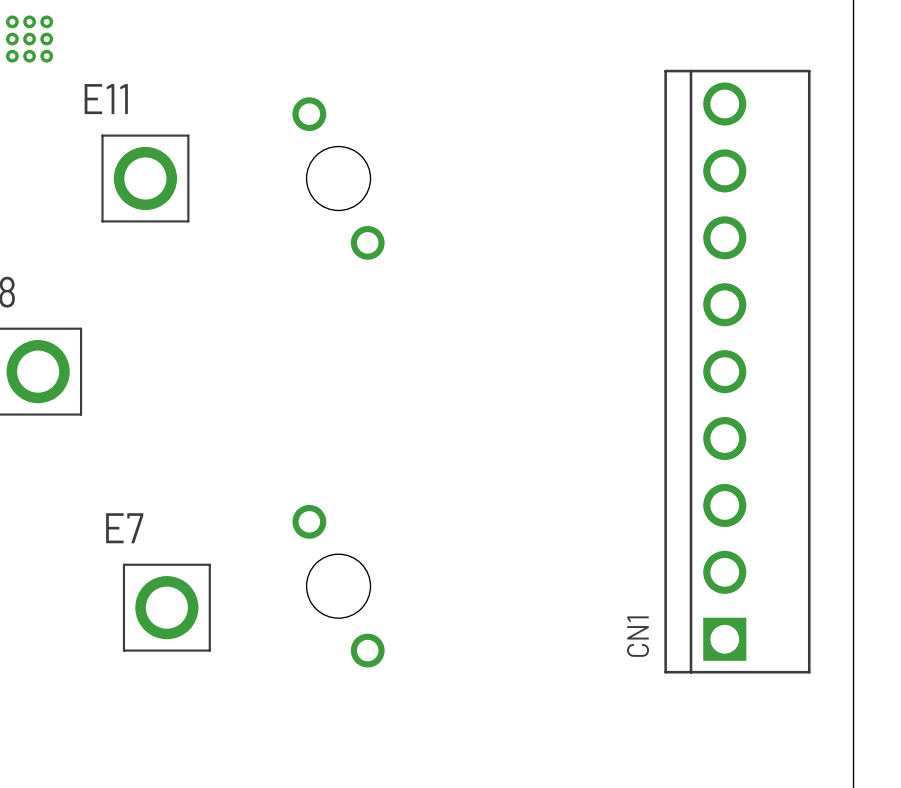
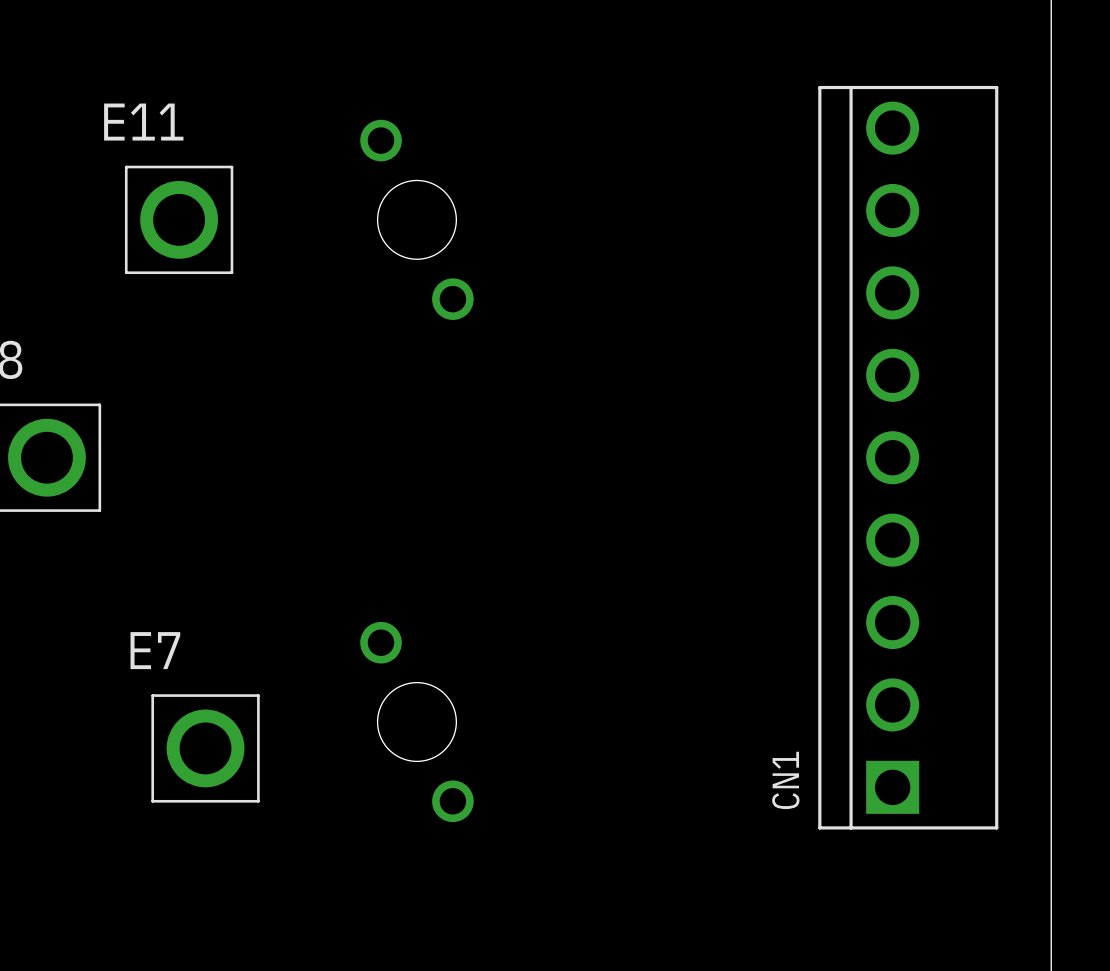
via: (12, 21) -> none
via: (29, 21) -> none
via: (46, 21) -> none
via: (12, 39) -> none
via: (29, 39) -> none
via: (46, 39) -> none
via: (12, 56) -> none
via: (29, 56) -> none
via: (46, 56) -> none

